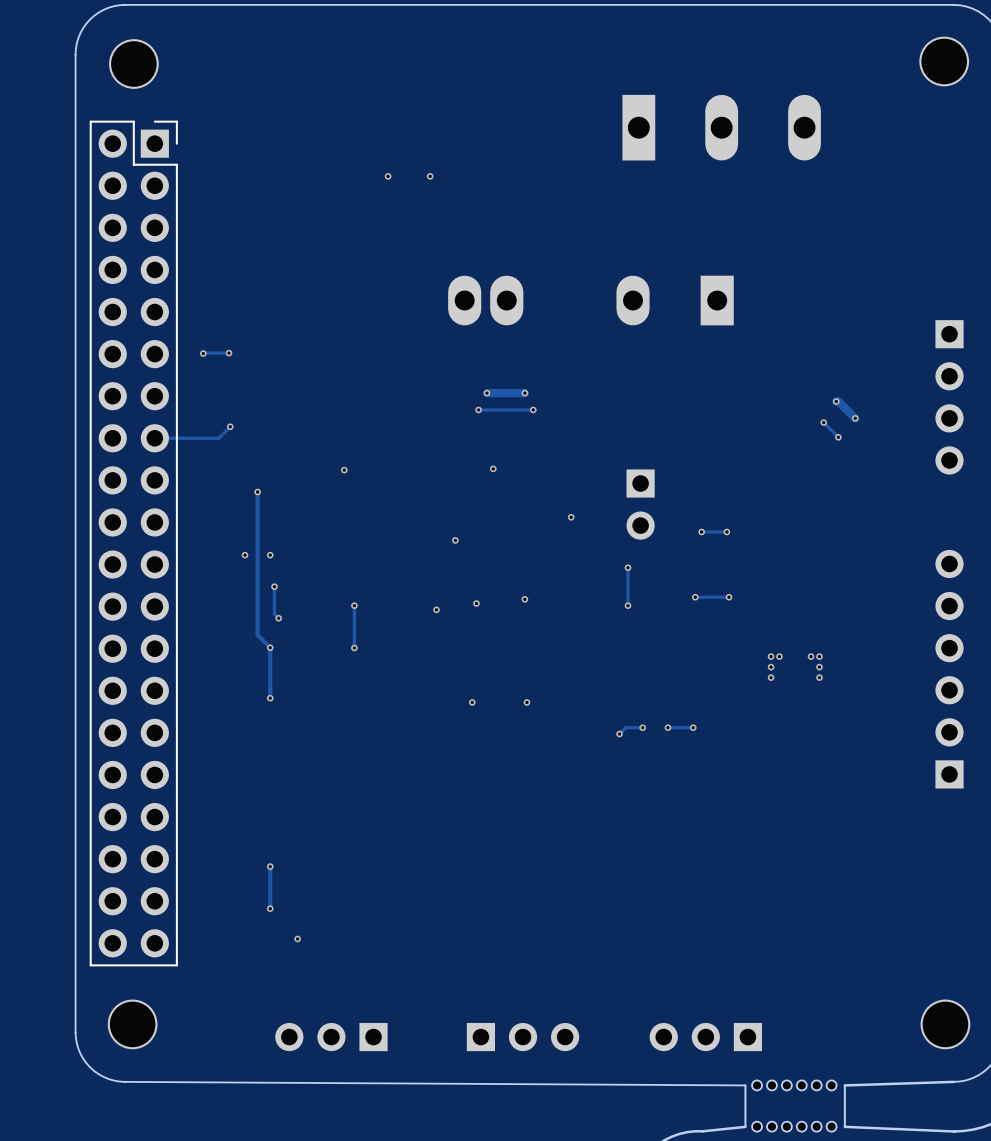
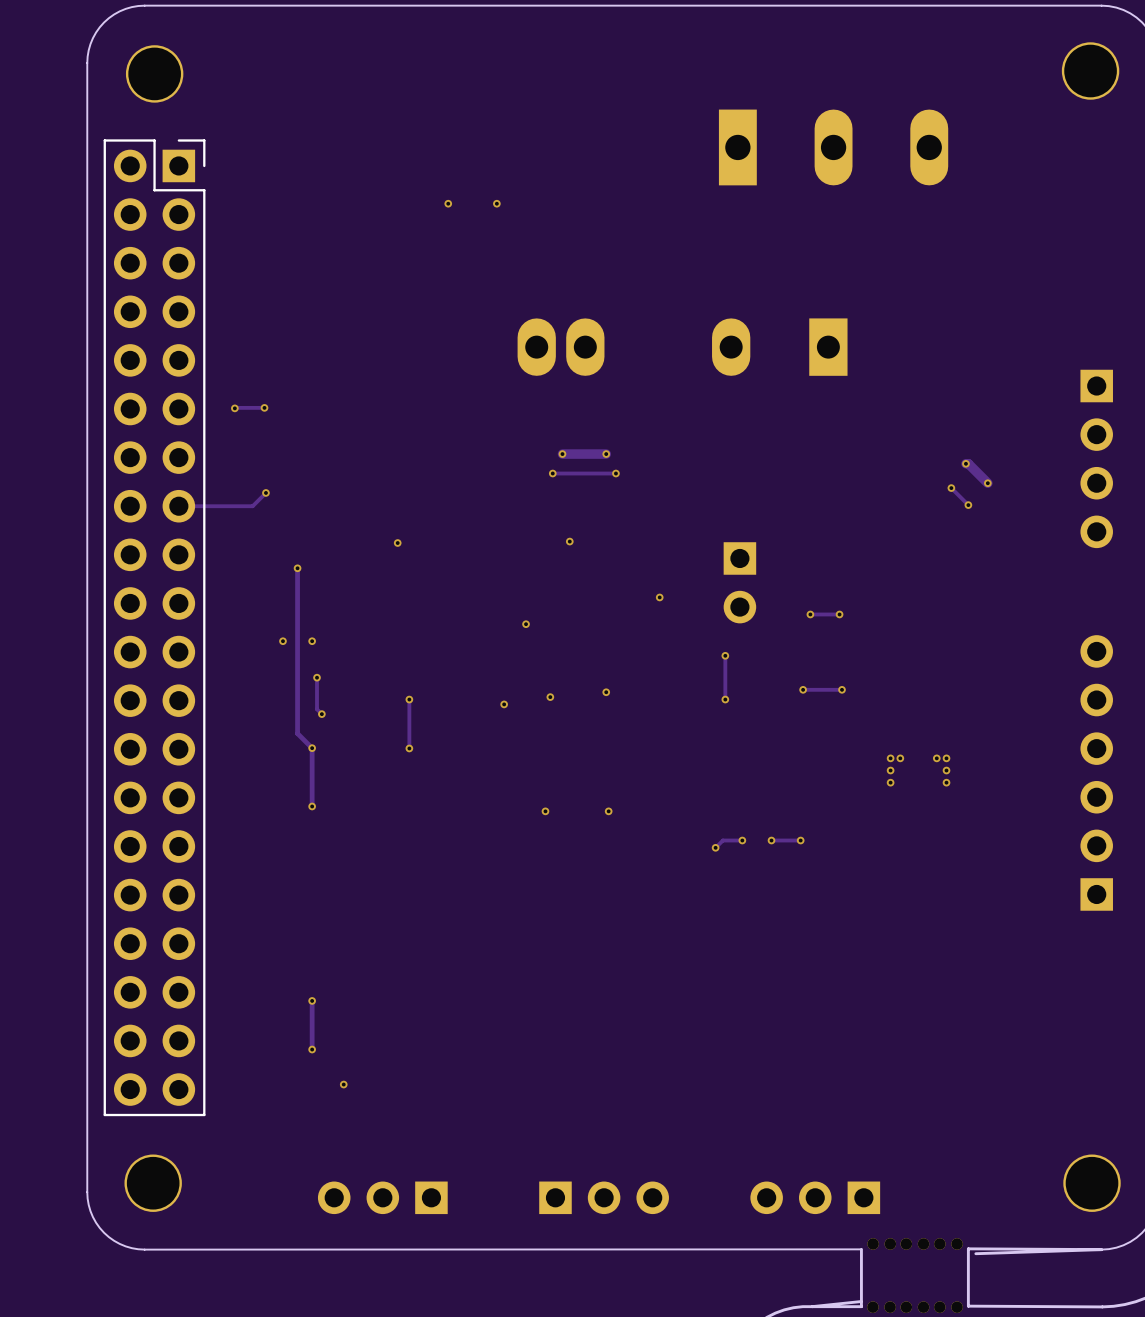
part: none -> (881, 1243)
part: none -> (914, 1243)
part: none -> (948, 1243)
board edge: (125, 1081) (745, 1085) -> (144, 1249) (861, 1249) (861, 1306) (812, 1306)
part: (795, 1106) -> none
board edge: (844, 1126) (954, 1131) -> (1101, 1249) (968, 1248) (968, 1306) (1102, 1306)
part: none -> (881, 1307)
part: none -> (914, 1307)
part: none -> (948, 1307)

